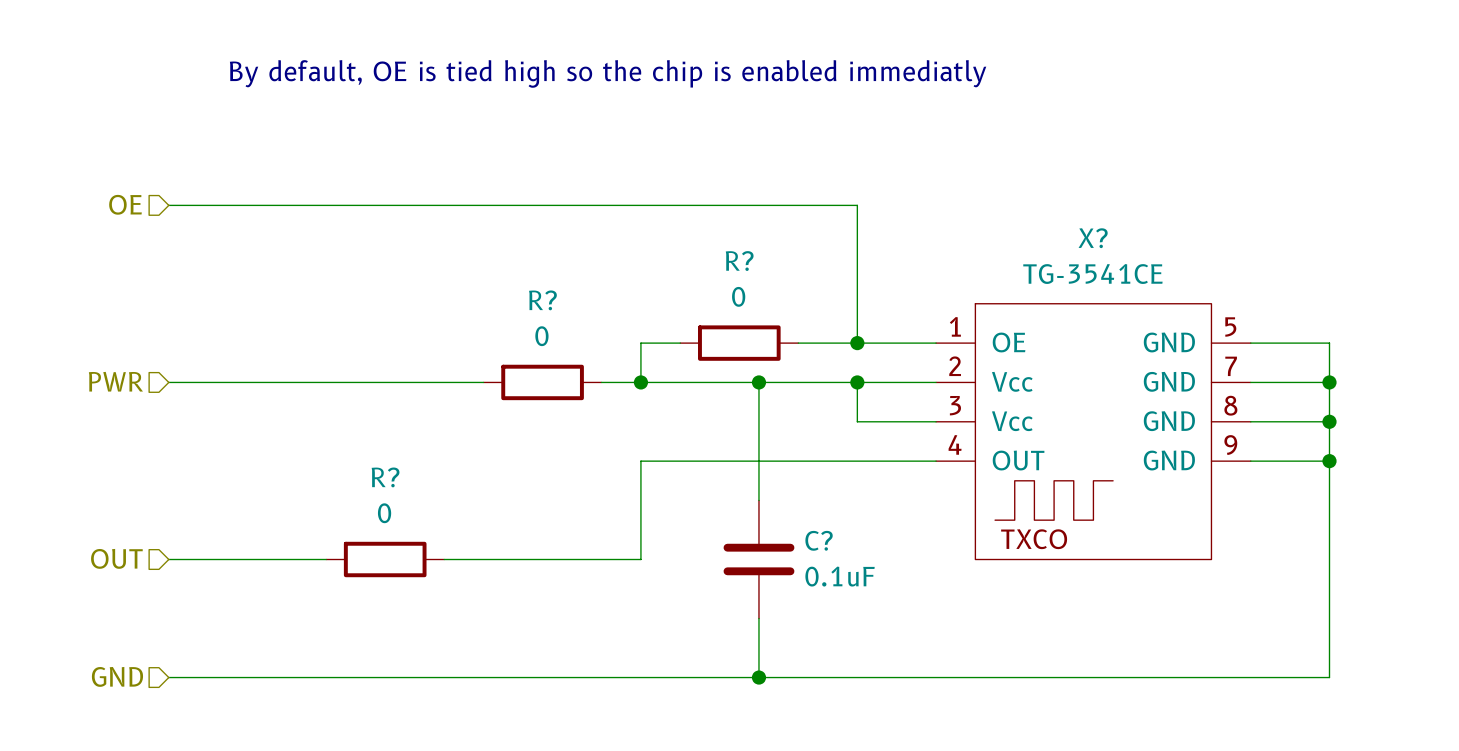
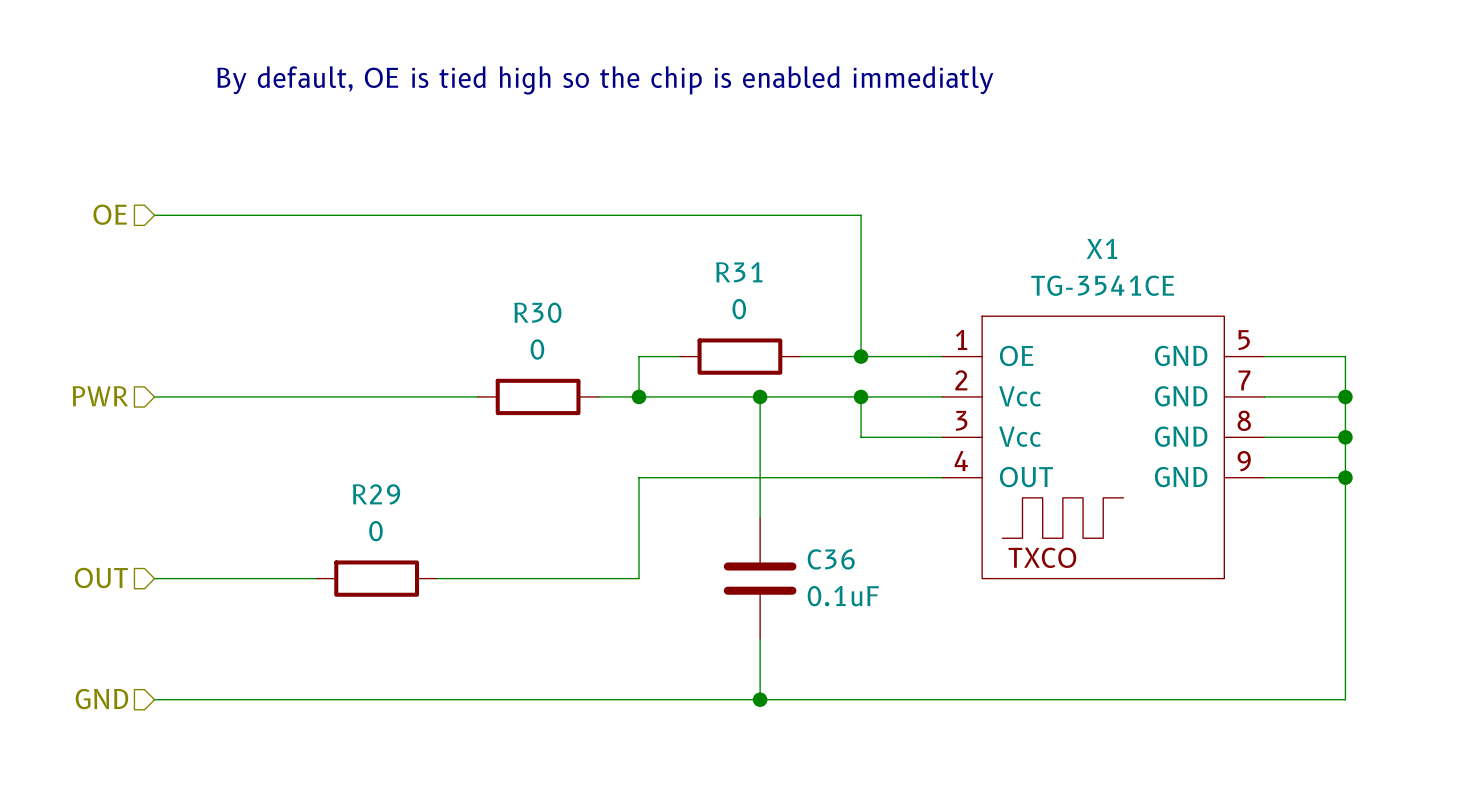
X? name: X? (1093, 238) -> X1 (1101, 248)
R? name: R? (739, 261) -> R31 (739, 272)
R? name: R? (542, 300) -> R30 (537, 312)
R? name: R? (385, 477) -> R29 (376, 494)
C? name: C? (819, 540) -> C36 (831, 559)

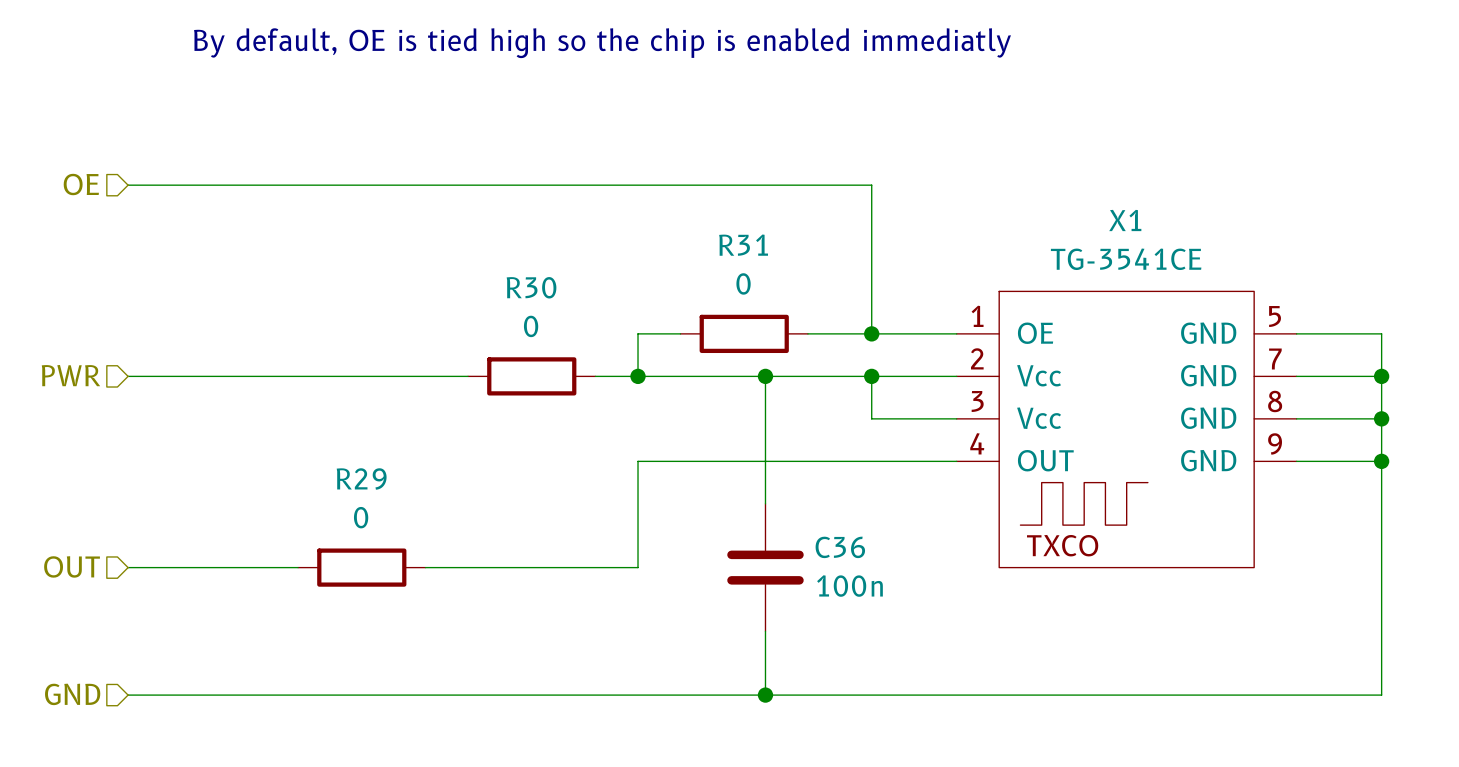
C36 value: 0.1uF (843, 596) -> 100n (849, 586)

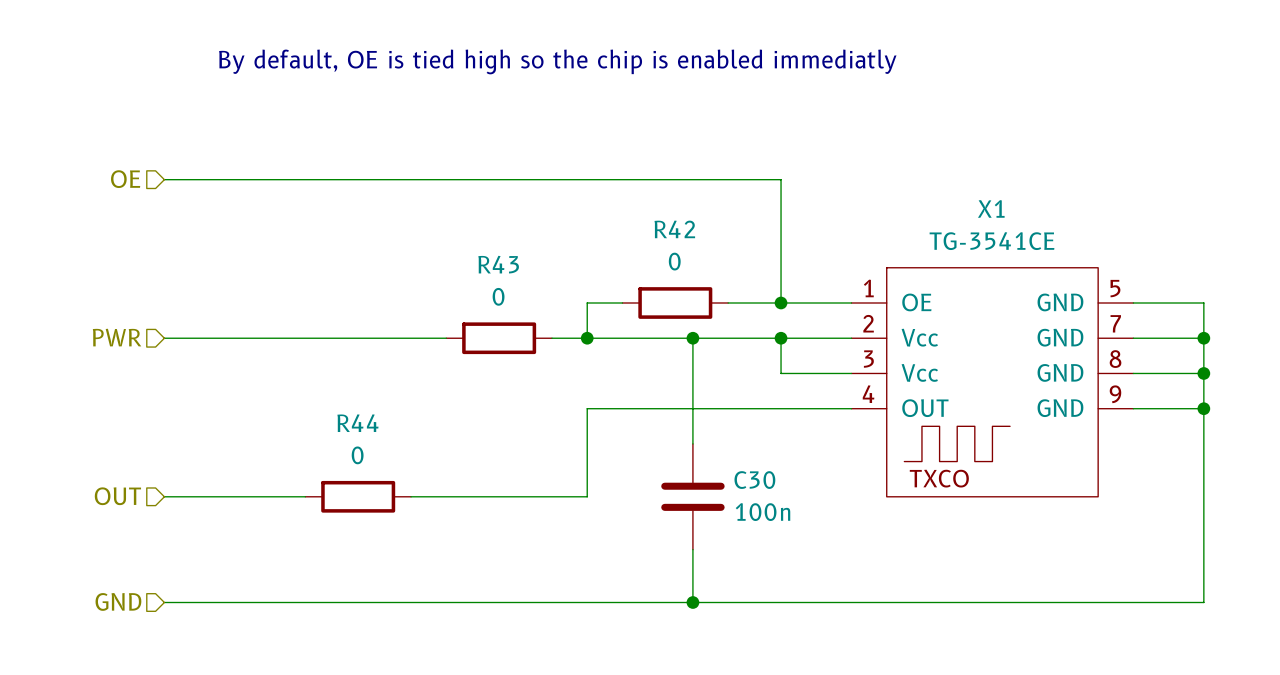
R31 name: R31 (743, 245) -> R42 (674, 229)
R30 name: R30 (531, 287) -> R43 (498, 264)
R29 name: R29 (361, 478) -> R44 (357, 423)
C36 name: C36 (840, 547) -> C30 (754, 480)

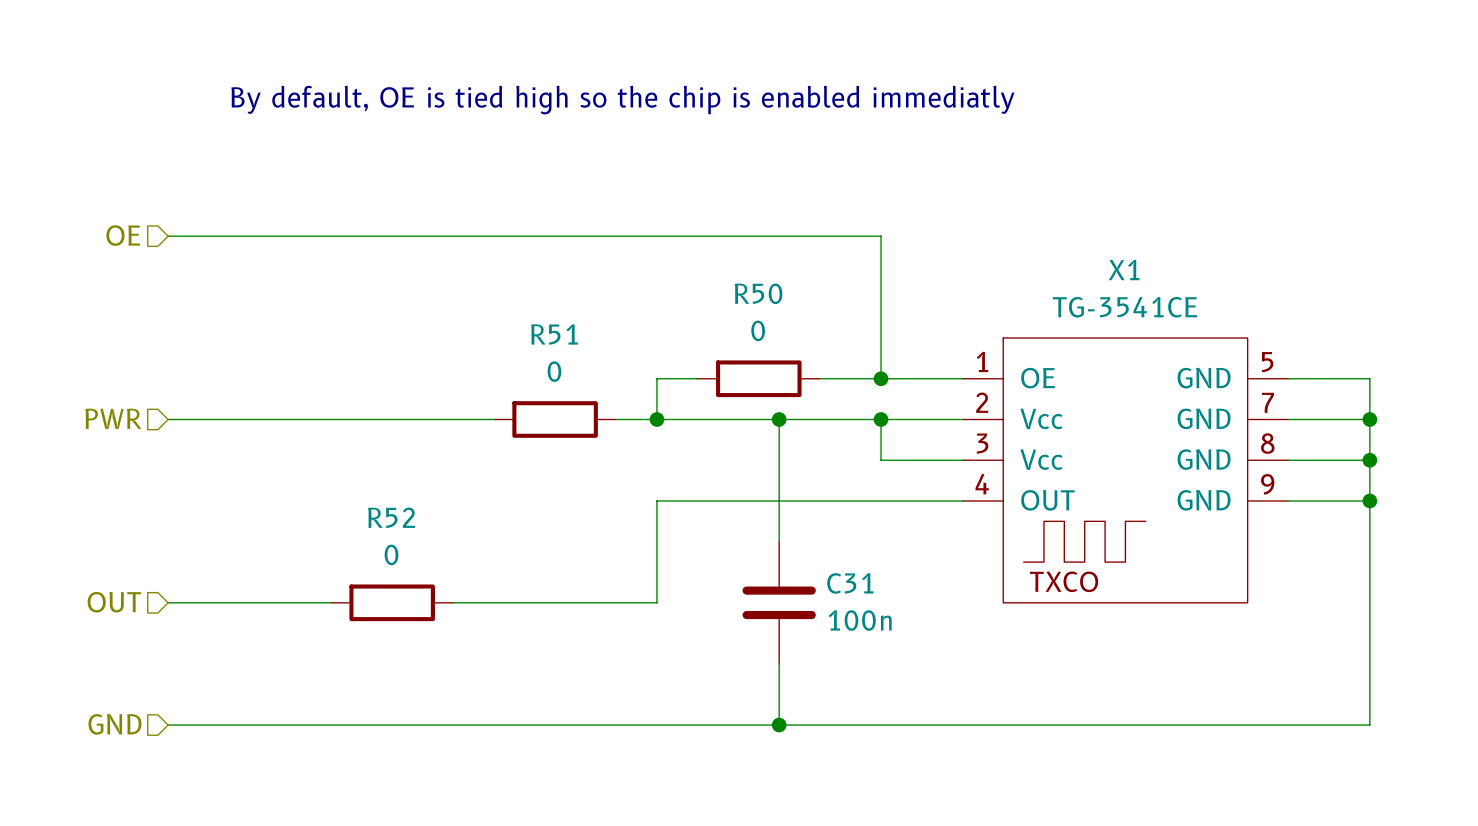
R42 name: R42 (674, 229) -> R50 (758, 293)
R43 name: R43 (498, 264) -> R51 (554, 334)
R44 name: R44 (357, 423) -> R52 (391, 517)
C30 name: C30 (754, 480) -> C31 (850, 583)

